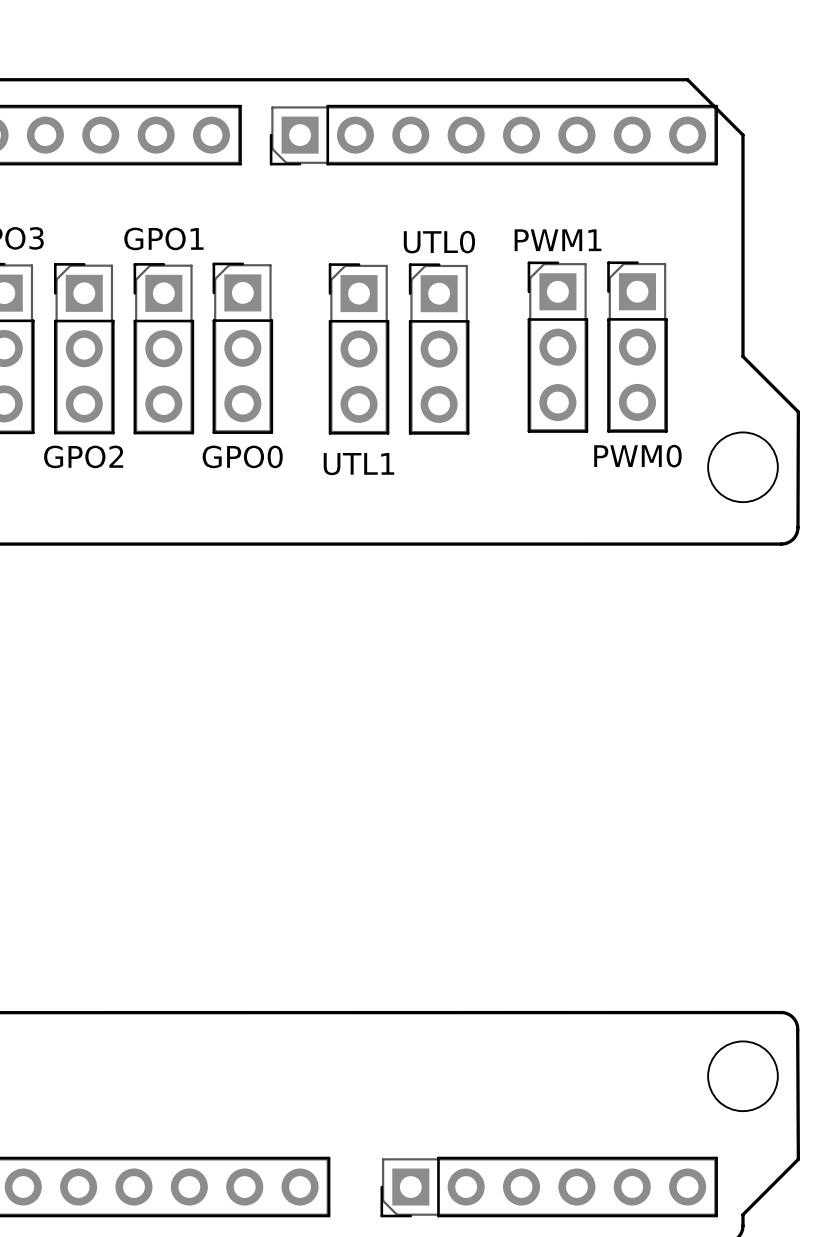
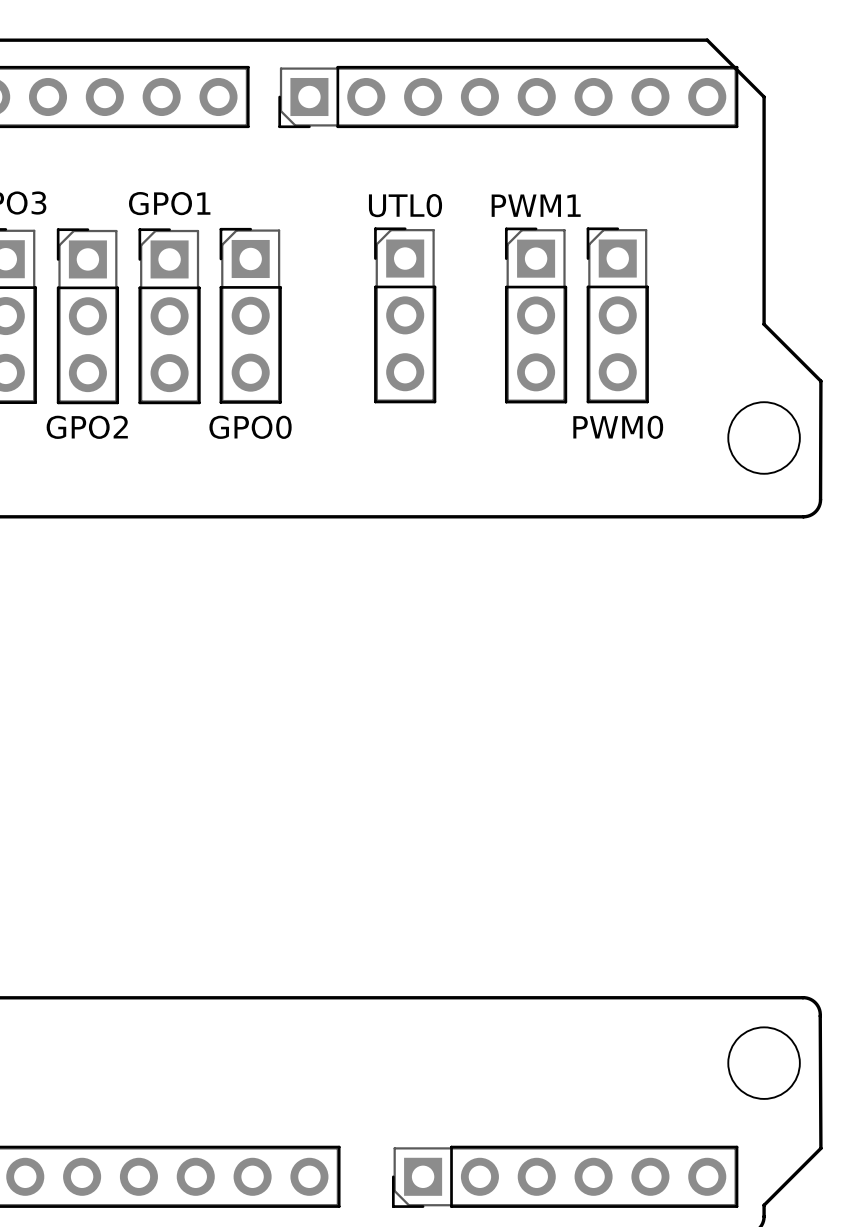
PWM1 position: (557, 347) -> (536, 315)
PWM0 position: (637, 347) -> (617, 315)
UTL1: (359, 348) -> none
UTL0 position: (439, 349) -> (405, 315)

